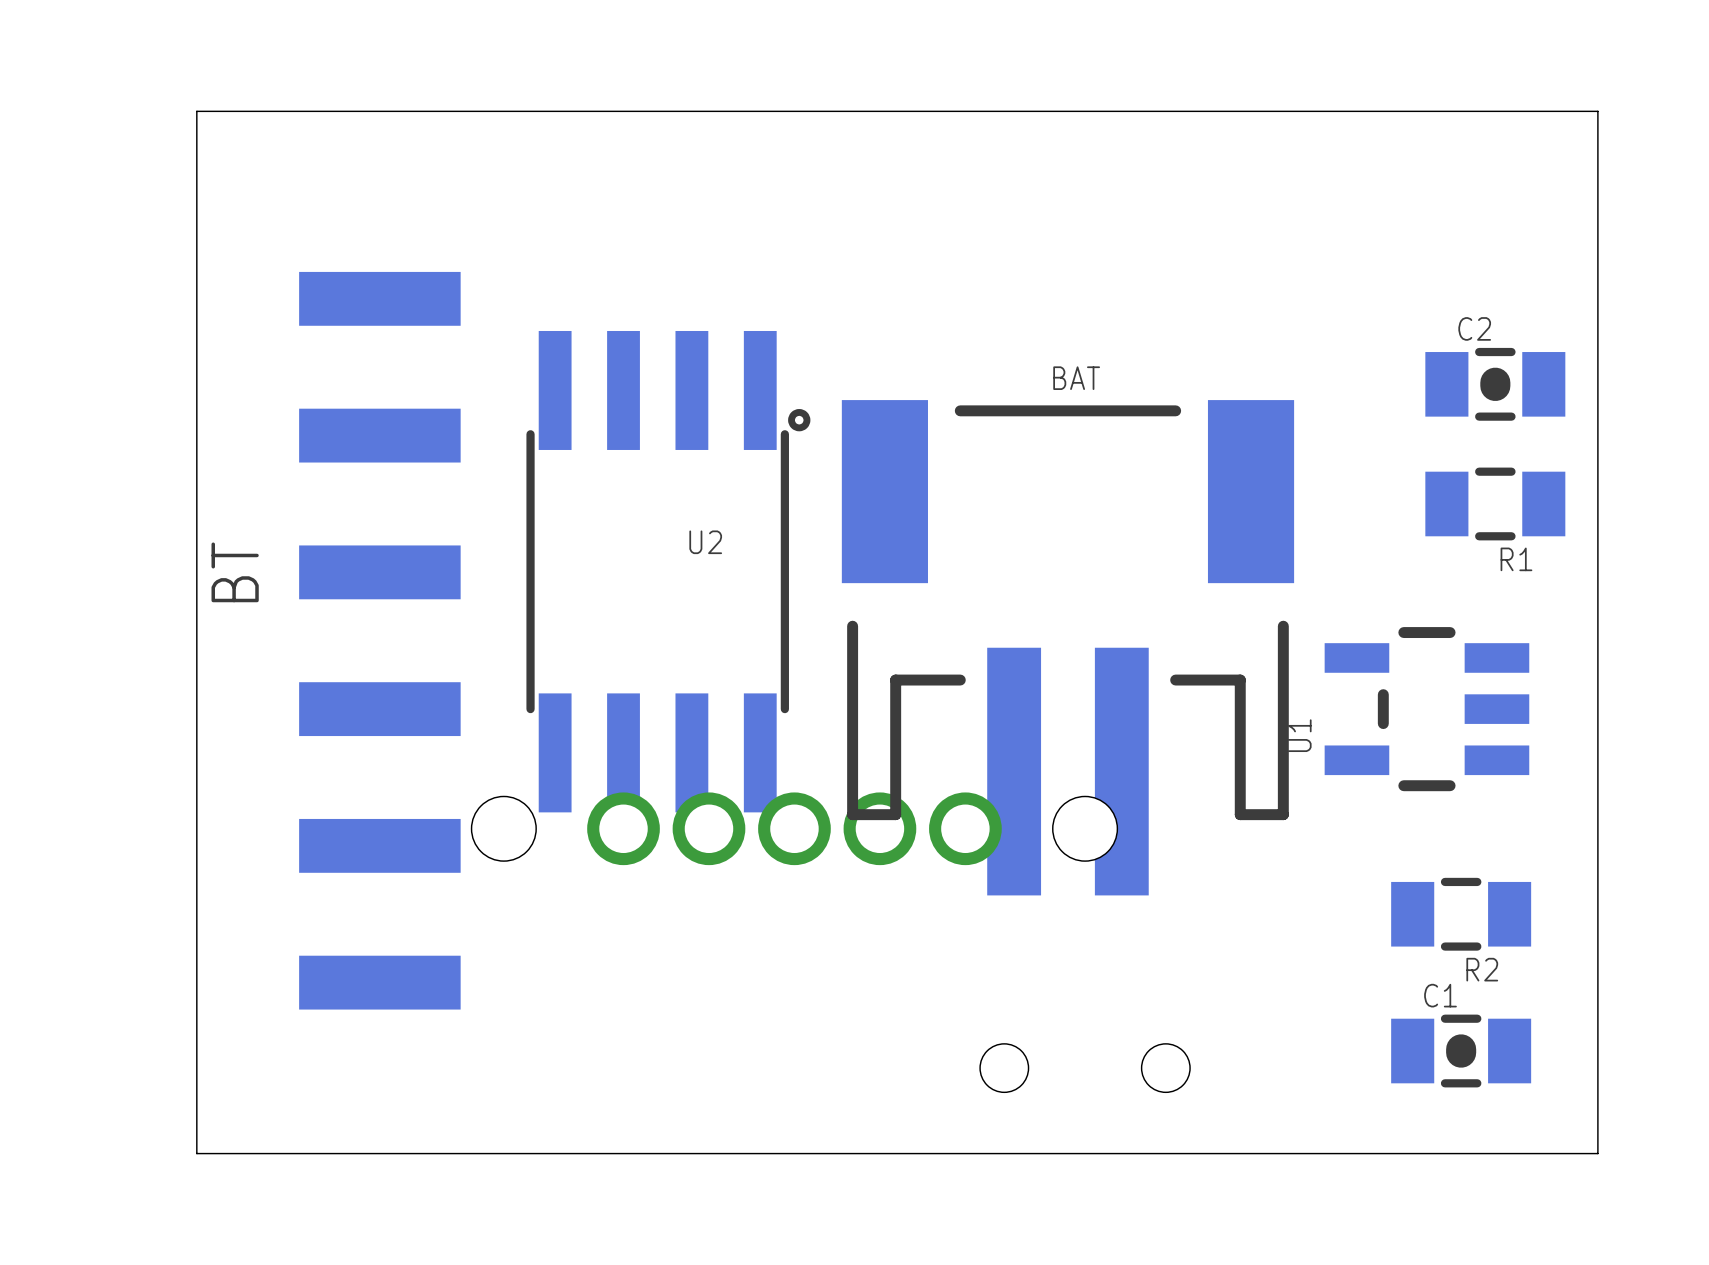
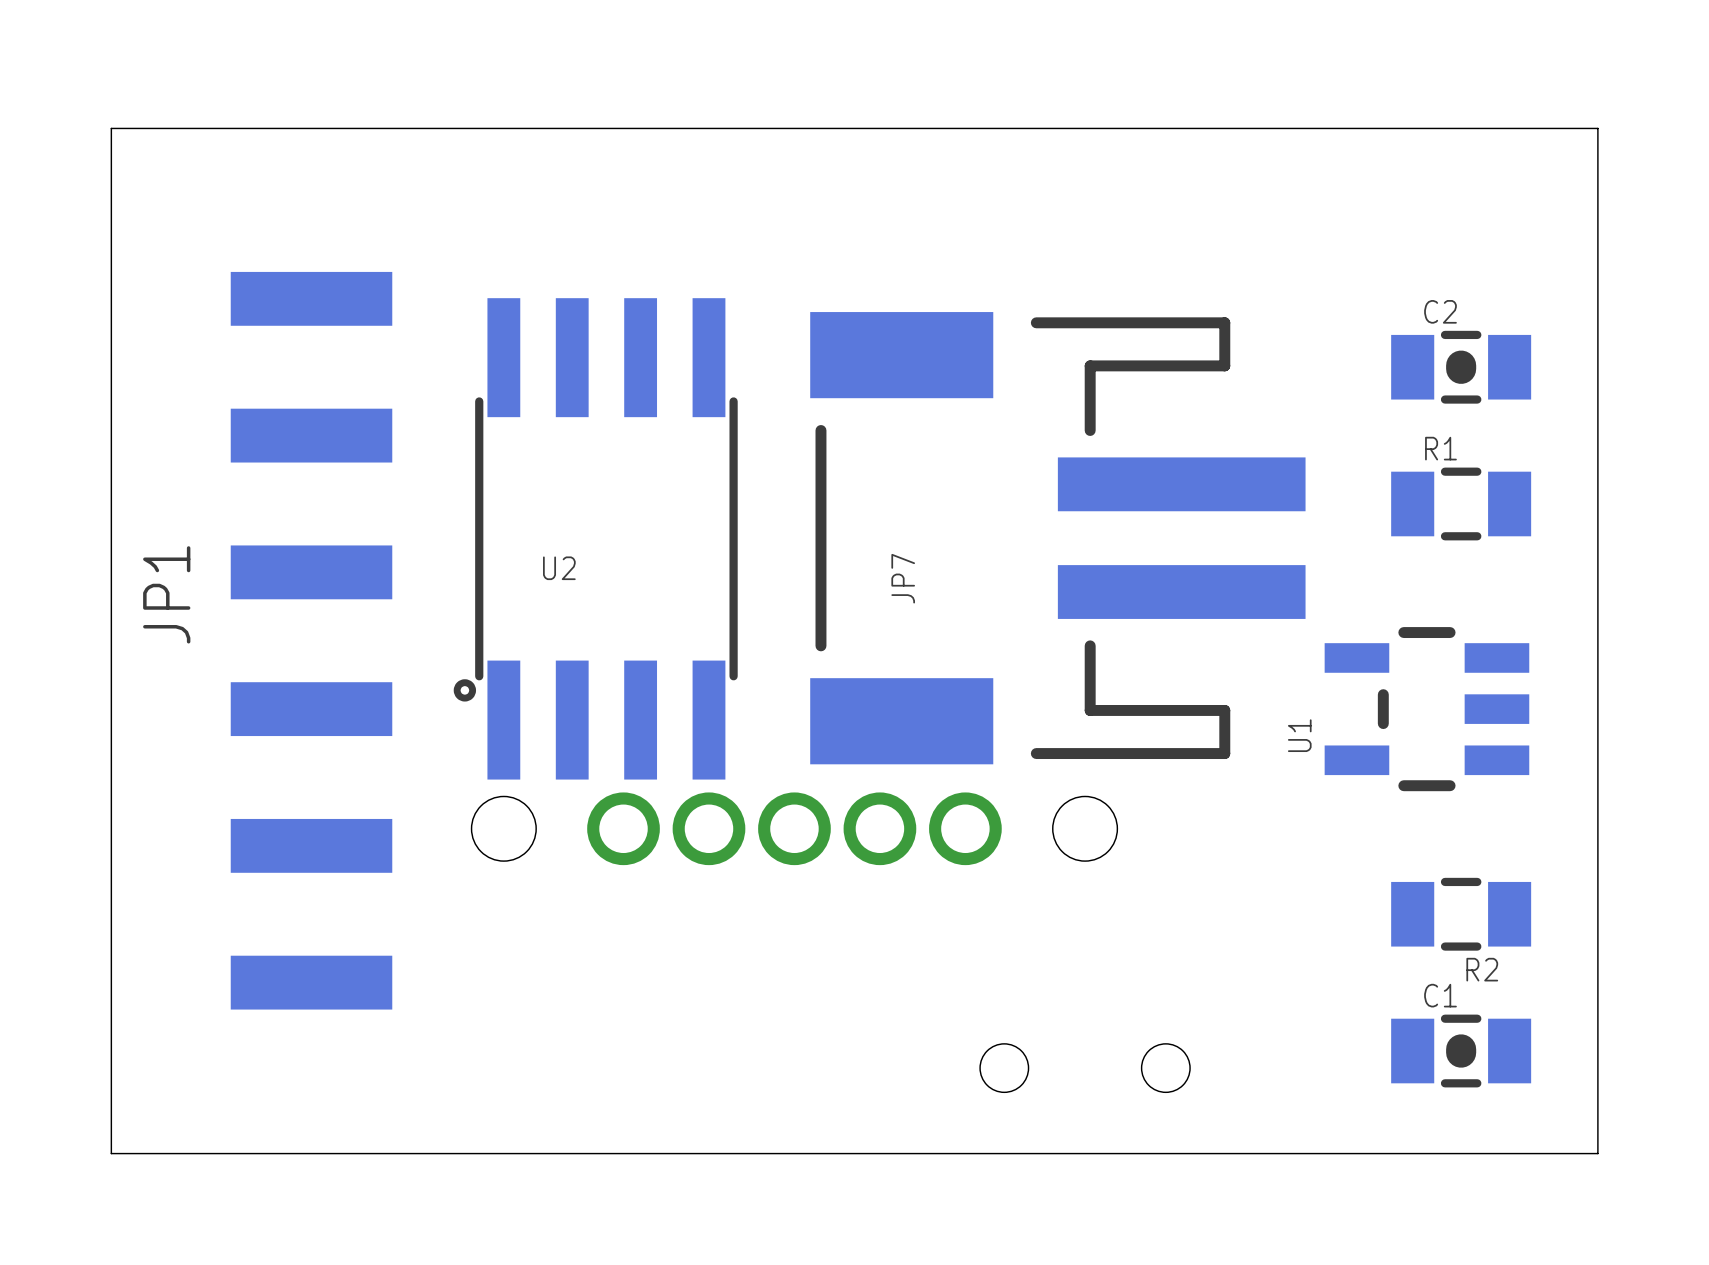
board edge: (1597, 128) (1597, 111) (196, 111) (196, 1153) -> (1597, 128) (111, 128) (111, 1153) (196, 1153)
C2 position: (1495, 384) -> (1461, 367)
R1 position: (1495, 503) -> (1461, 503)
JP7: none -> (1057, 538)
R1 name position: R1 (1516, 559) -> R1 (1440, 448)
U2 rotation: 0° (668, 571) -> 180° (595, 538)
JP1: none -> (311, 640)
BT: (379, 640) -> none
BAT: (1067, 647) -> none

